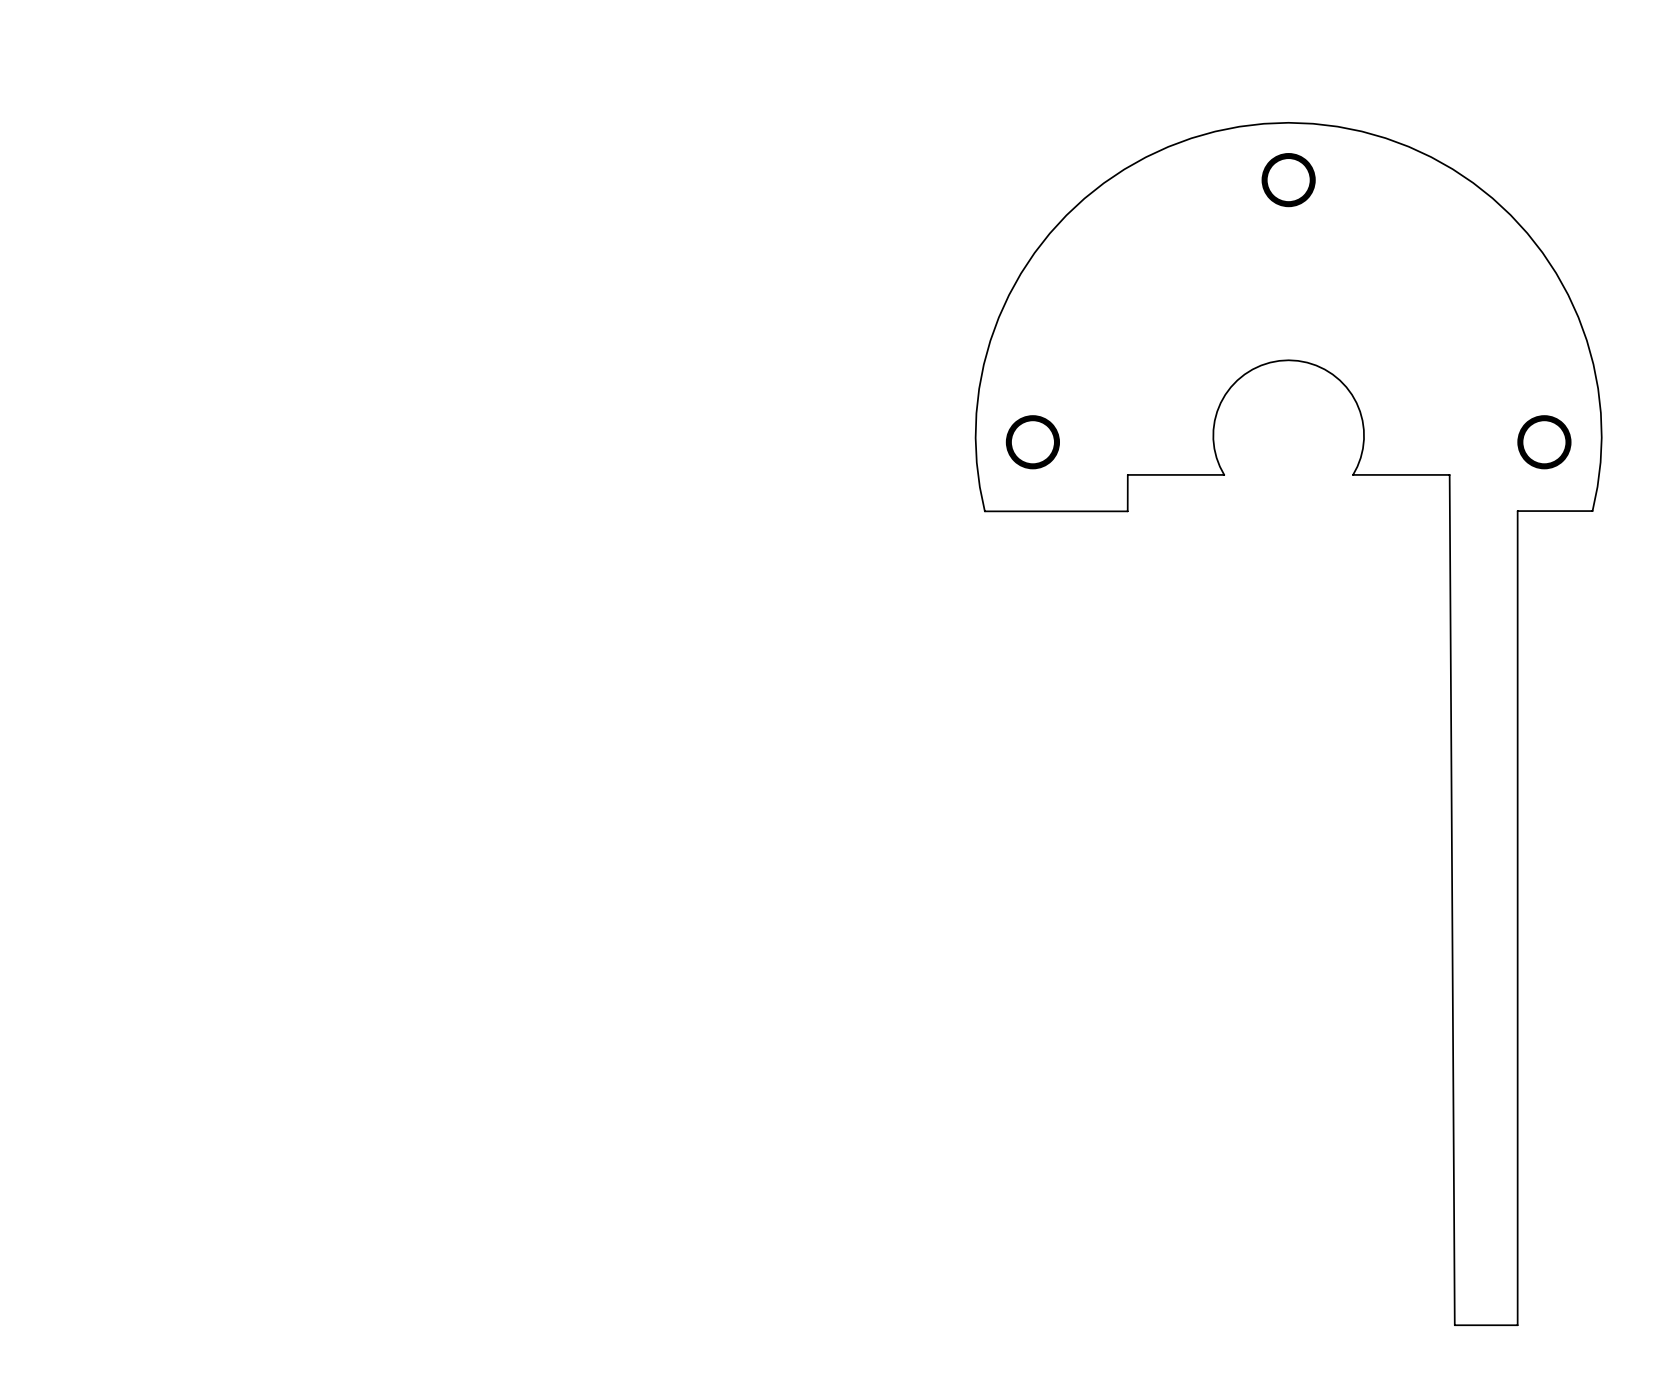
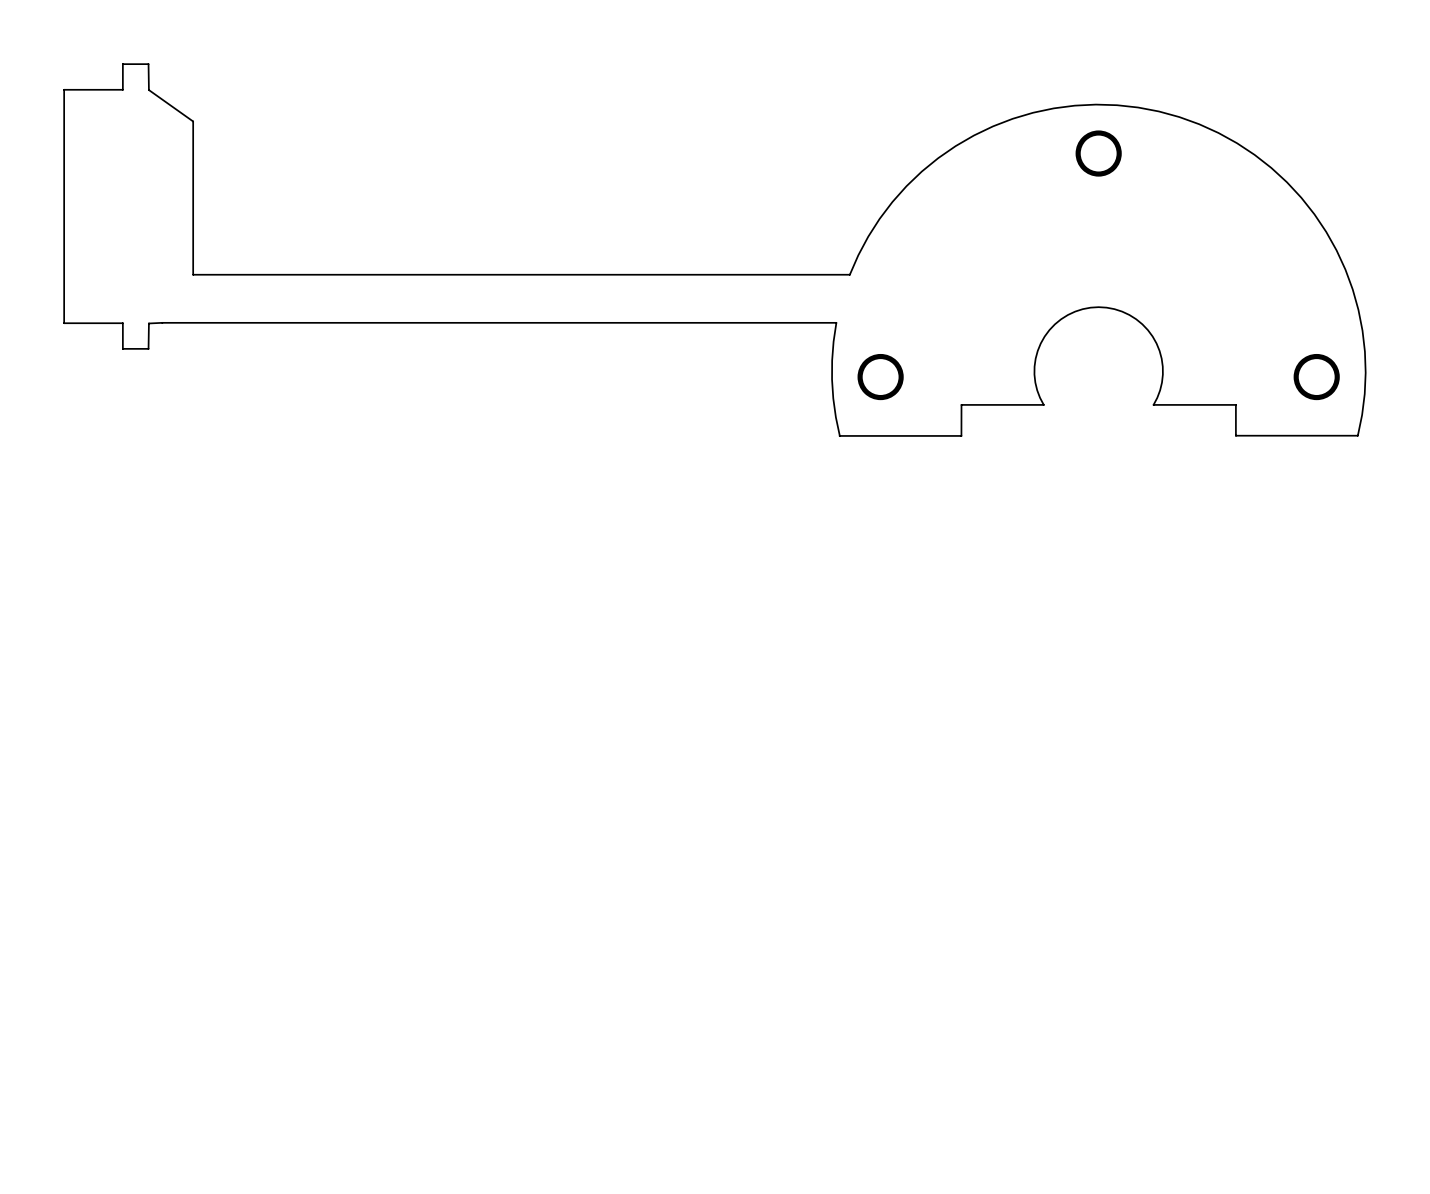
part: none -> (106, 206)
board edge: none -> (148, 348) (148, 323) (162, 322) (836, 322) (832, 379) (839, 435)
board edge: (1449, 474) (1454, 1325) (1517, 1325) (1517, 511) -> (1235, 404) (1235, 435) (1293, 435)
board edge: (1592, 511) (1597, 486) (1601, 437) (1600, 413) (1593, 364) (1578, 317) (1568, 294) (1542, 252) (1527, 233) (1492, 198) (1473, 182) (1431, 157) (1385, 138) (1361, 131) (1337, 126) (1288, 122) (1239, 126) (1215, 131) (1168, 146) (1145, 157) (1124, 169) (1084, 198) (1066, 215) (1034, 252) (1009, 295) (998, 317) (983, 364) (979, 388) (975, 438) (976, 462) (984, 511) -> (1357, 435) (1362, 415) (1365, 372) (1362, 330) (1352, 289) (1345, 269) (1326, 231) (1301, 197) (1271, 167) (1254, 154) (1218, 132) (1179, 117) (1158, 111) (1117, 105) (1074, 105) (1053, 108) (1012, 118) (973, 135) (938, 158) (921, 171) (892, 201) (868, 236) (849, 274) (193, 274) (193, 121) (148, 90) (148, 64)

